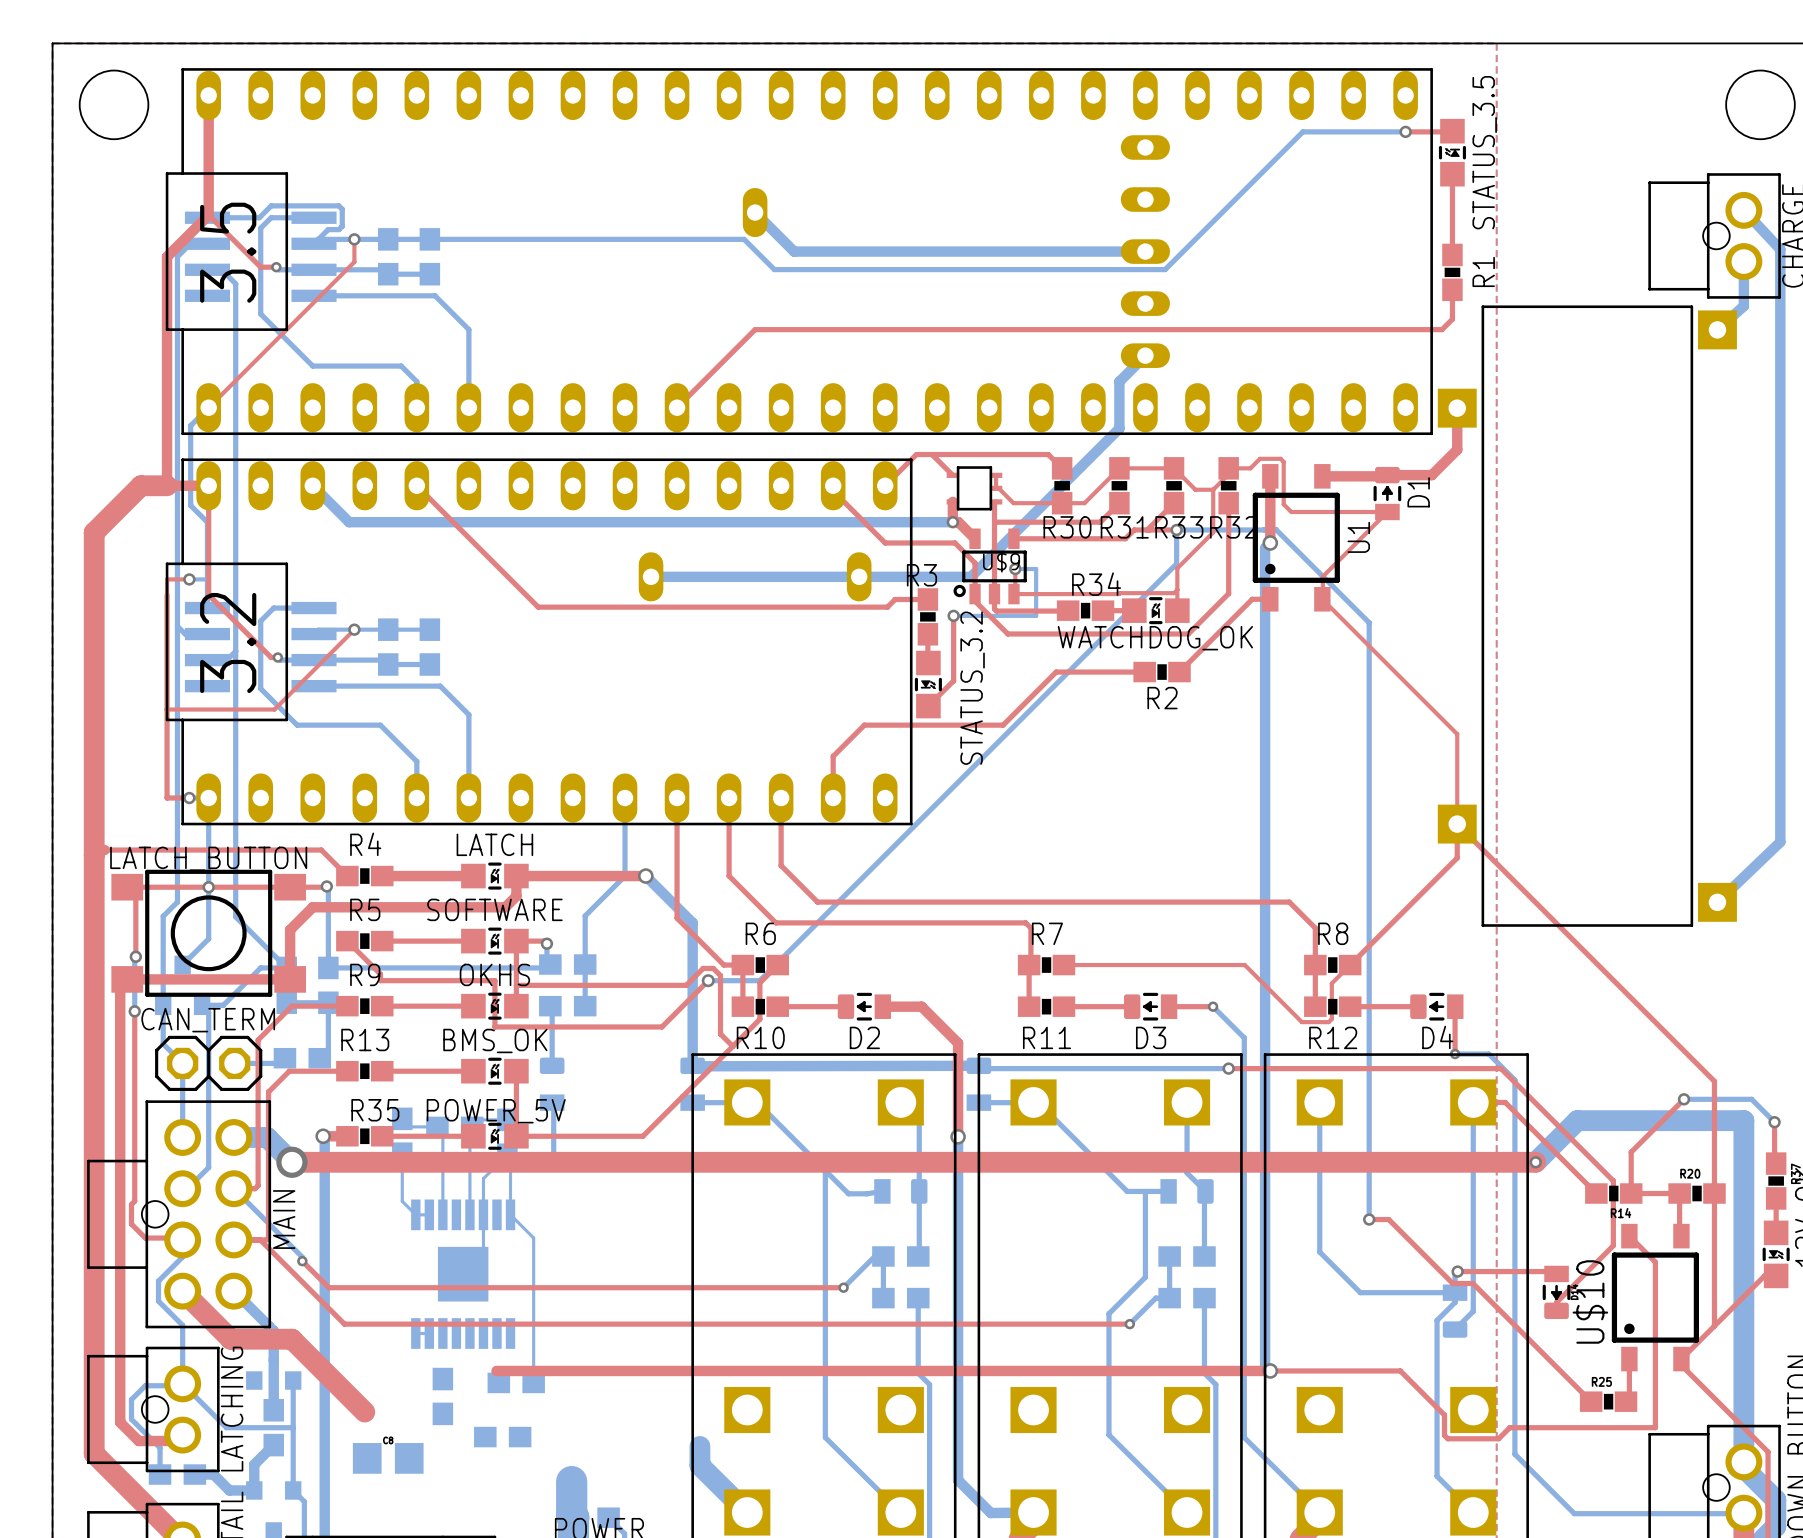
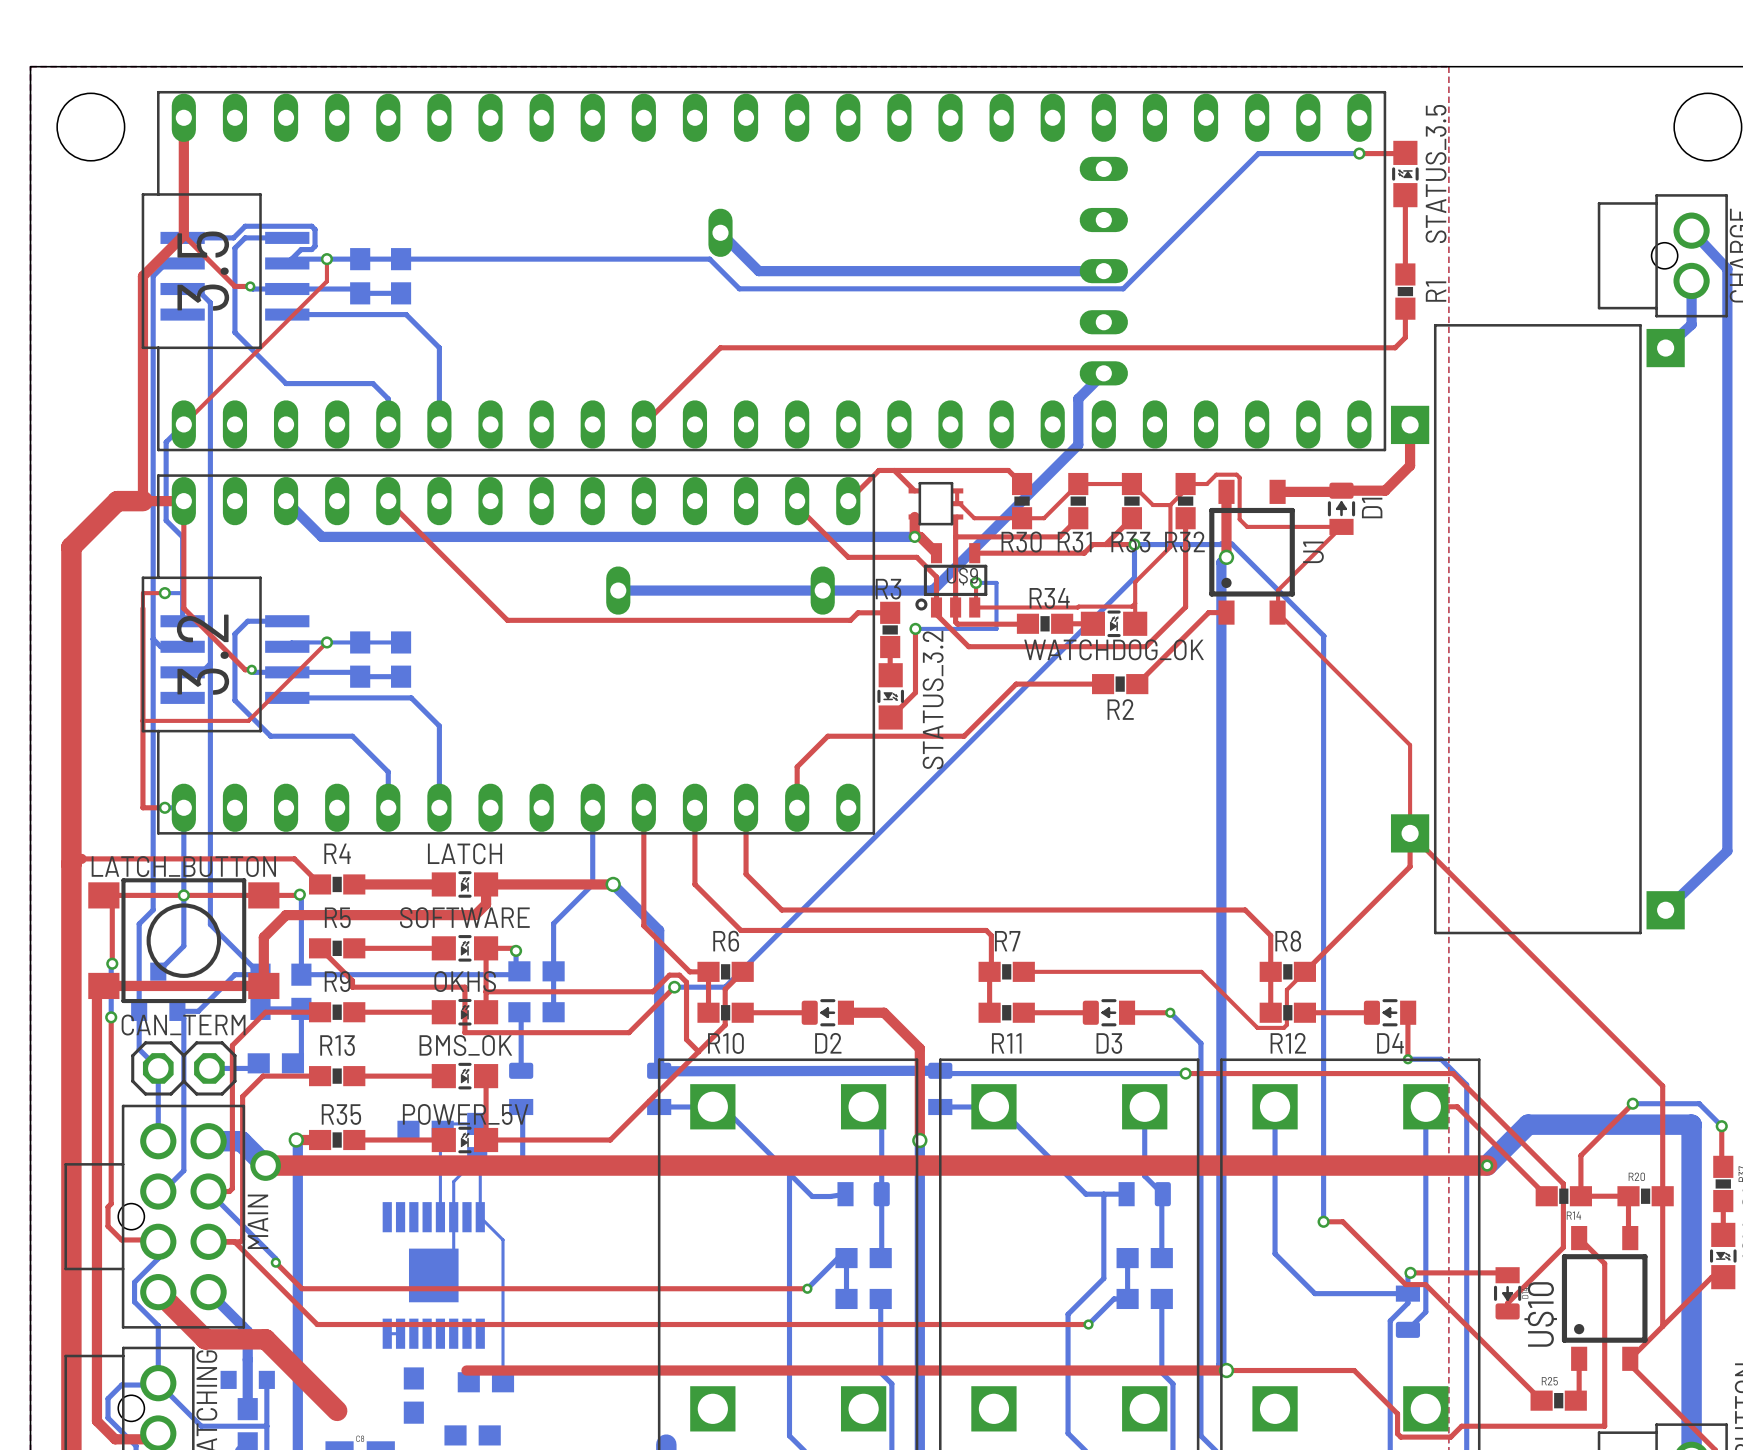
bottom track: (402, 1118) (410, 1126) (437, 1126) (442, 1132) (442, 1214) -> none
part: (402, 1136) -> none
bottom track: (402, 1153) (402, 1201) (415, 1214) (429, 1214) -> none

